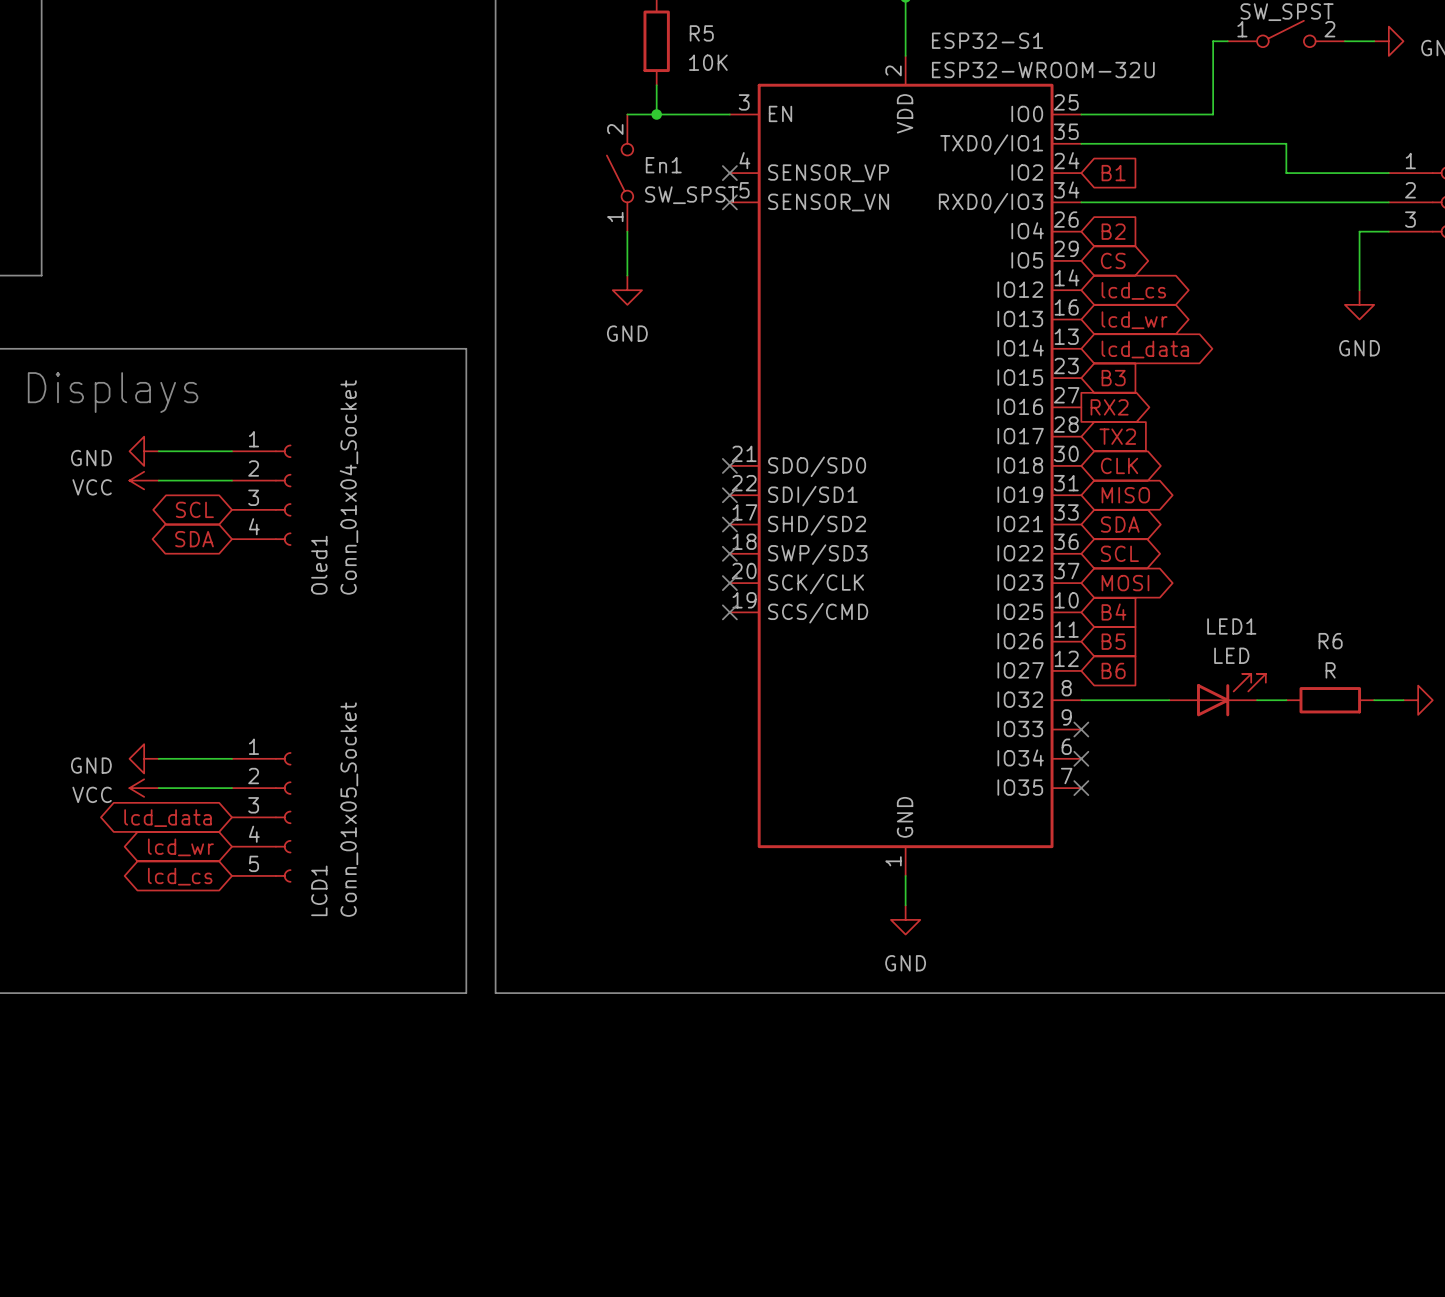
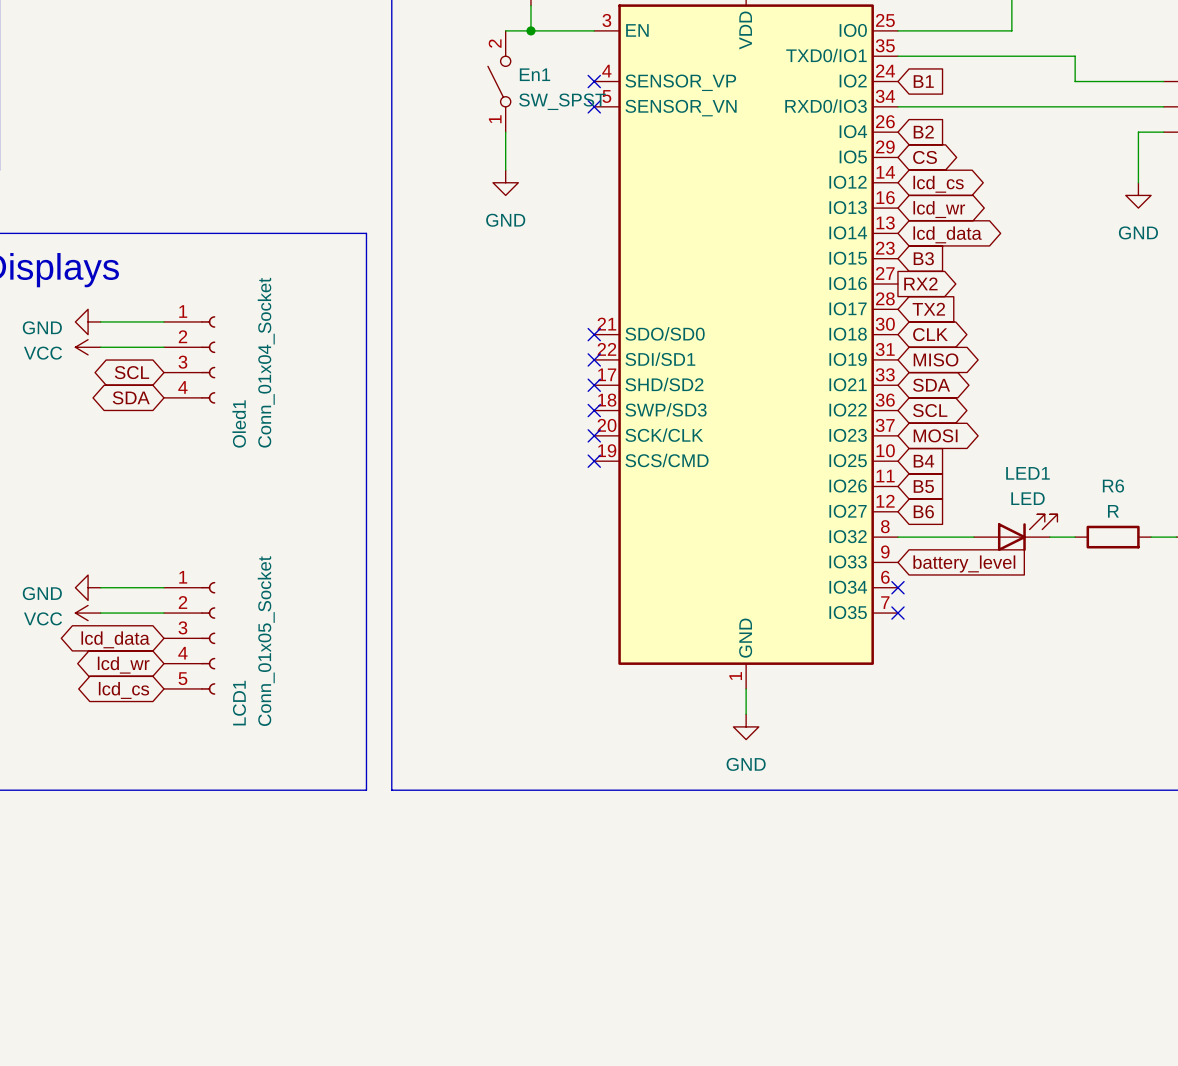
no-connect mark: (1081, 729) -> none
global label: none -> battery_level (964, 563)

